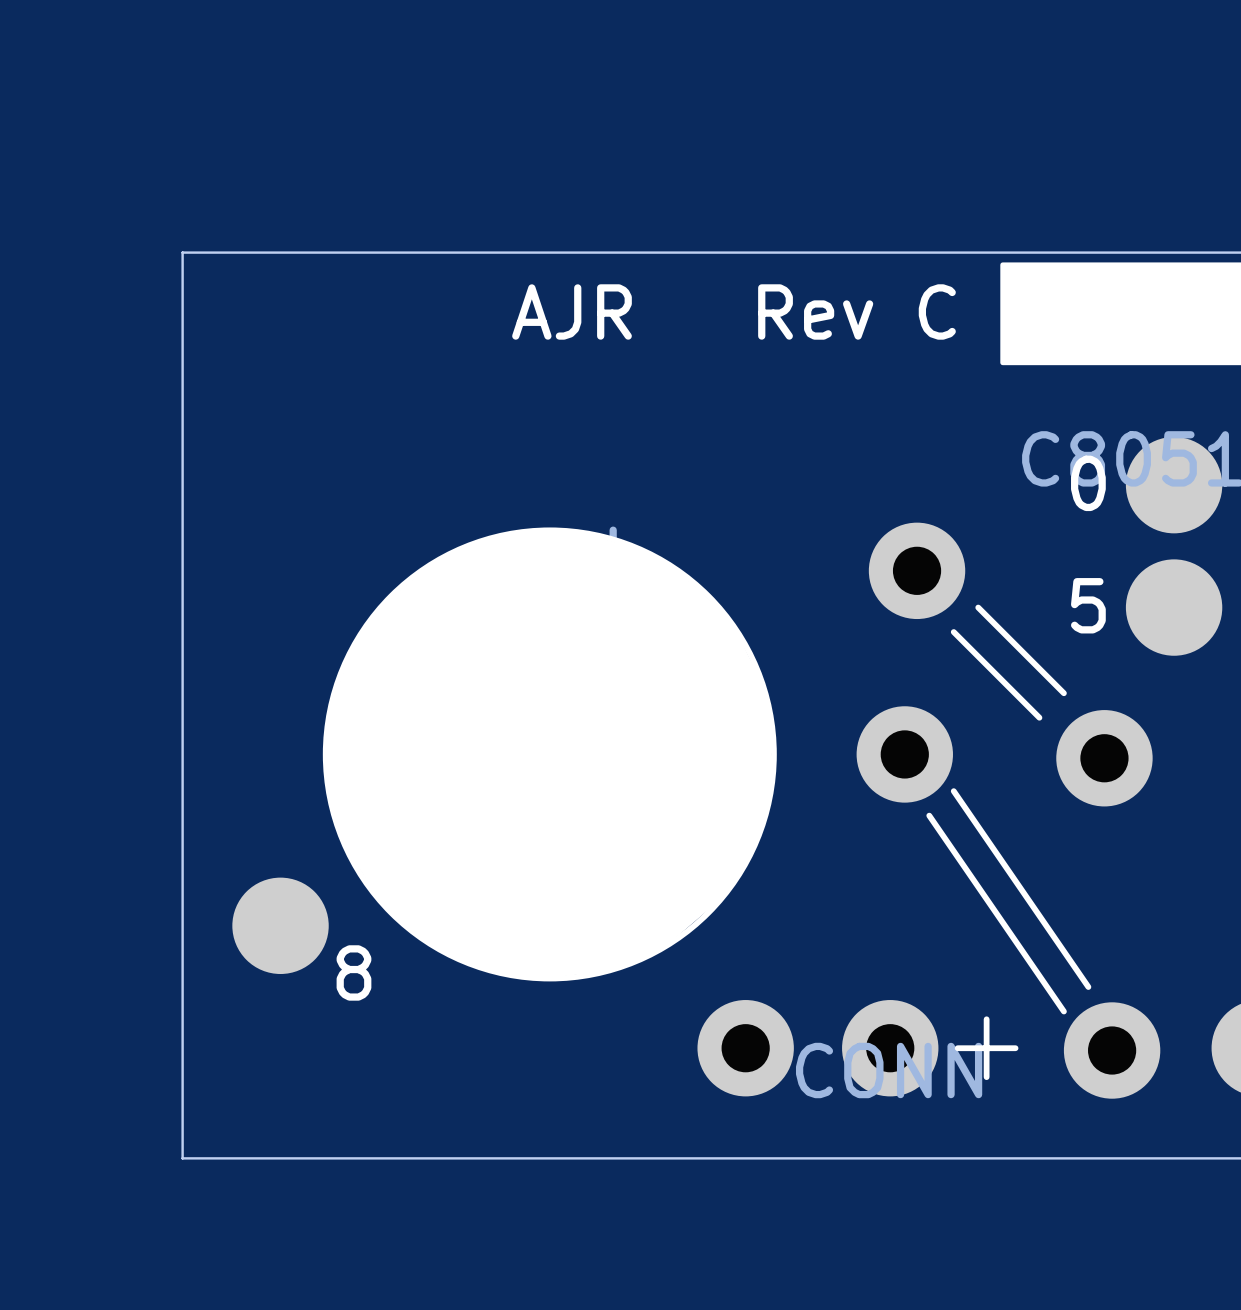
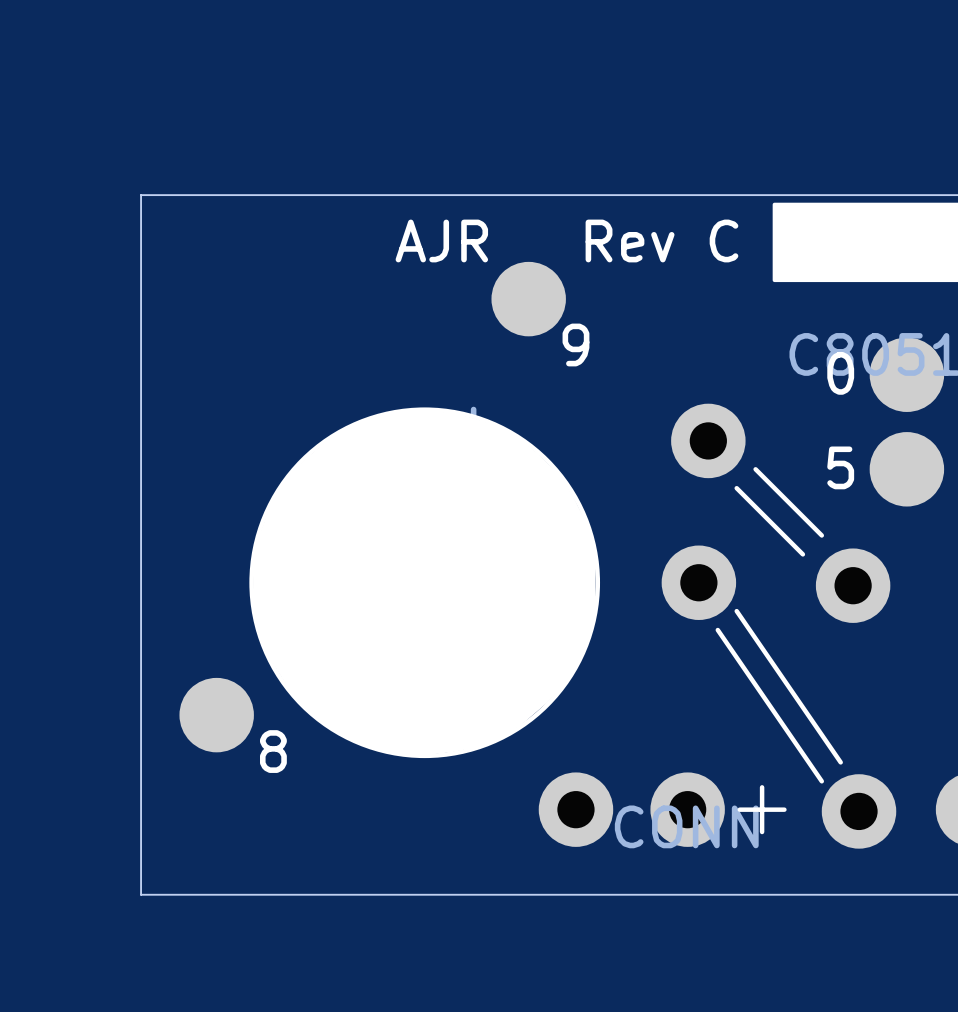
part: none -> (528, 299)
text: none -> 9 (575, 344)

